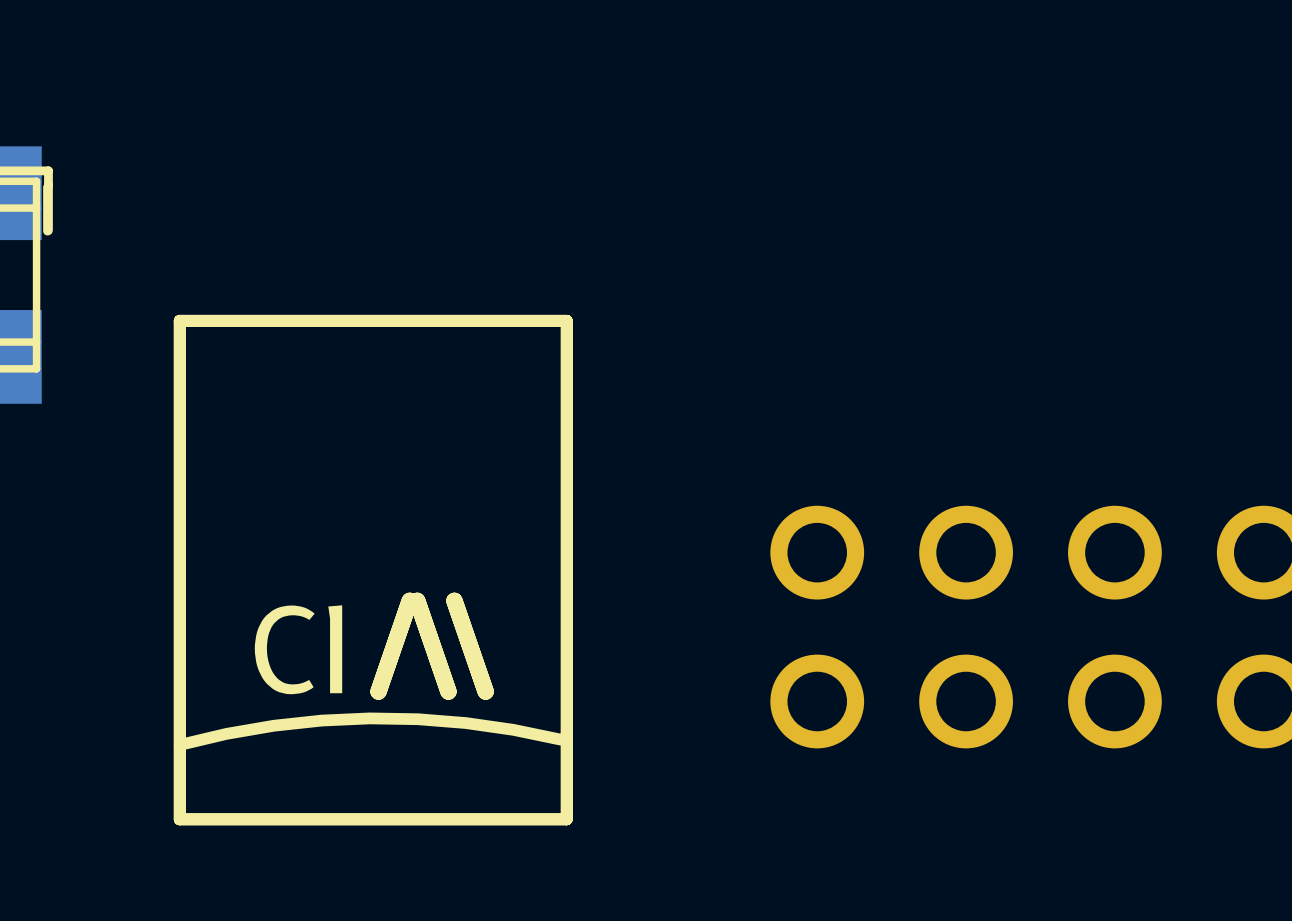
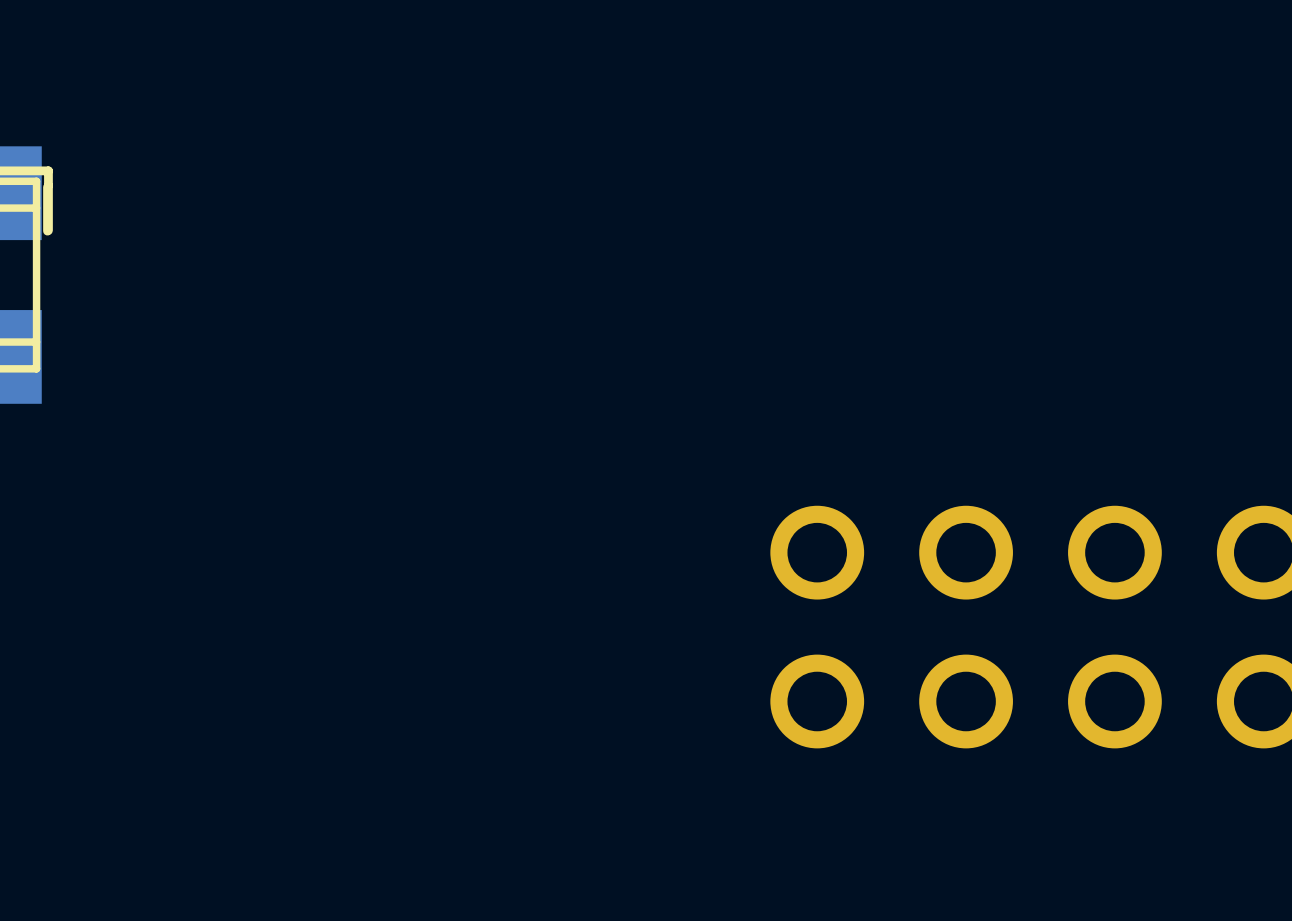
line: (566, 320) (179, 320) (179, 819) (566, 819) (566, 320) -> none
line: (409, 600) (378, 691) -> none
line: (417, 600) (448, 691) -> none
line: (454, 600) (485, 691) -> none
text: CI (298, 649) -> none
line: (560, 739) (465, 723) (369, 718) (273, 725) (226, 733) (179, 744) -> none

